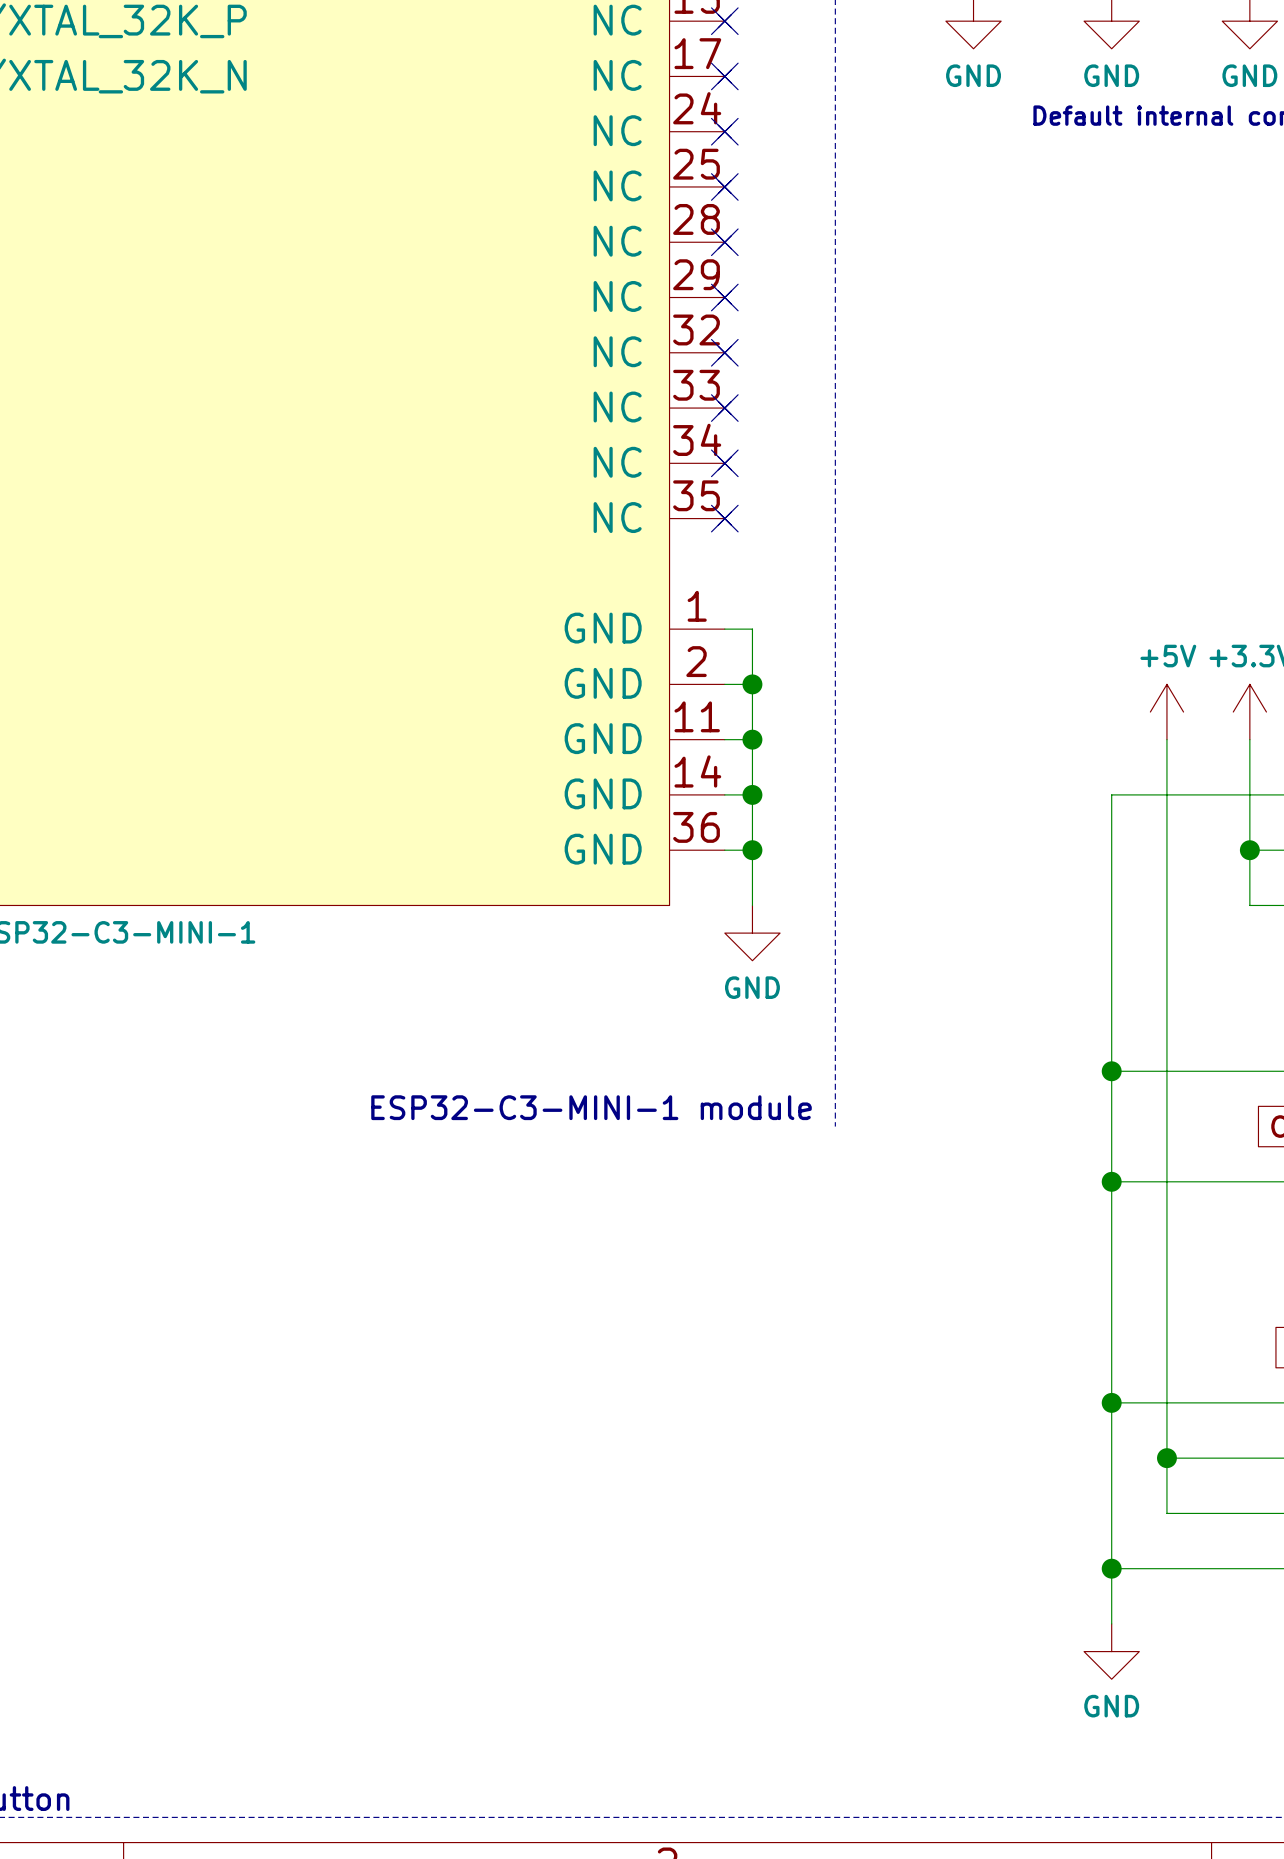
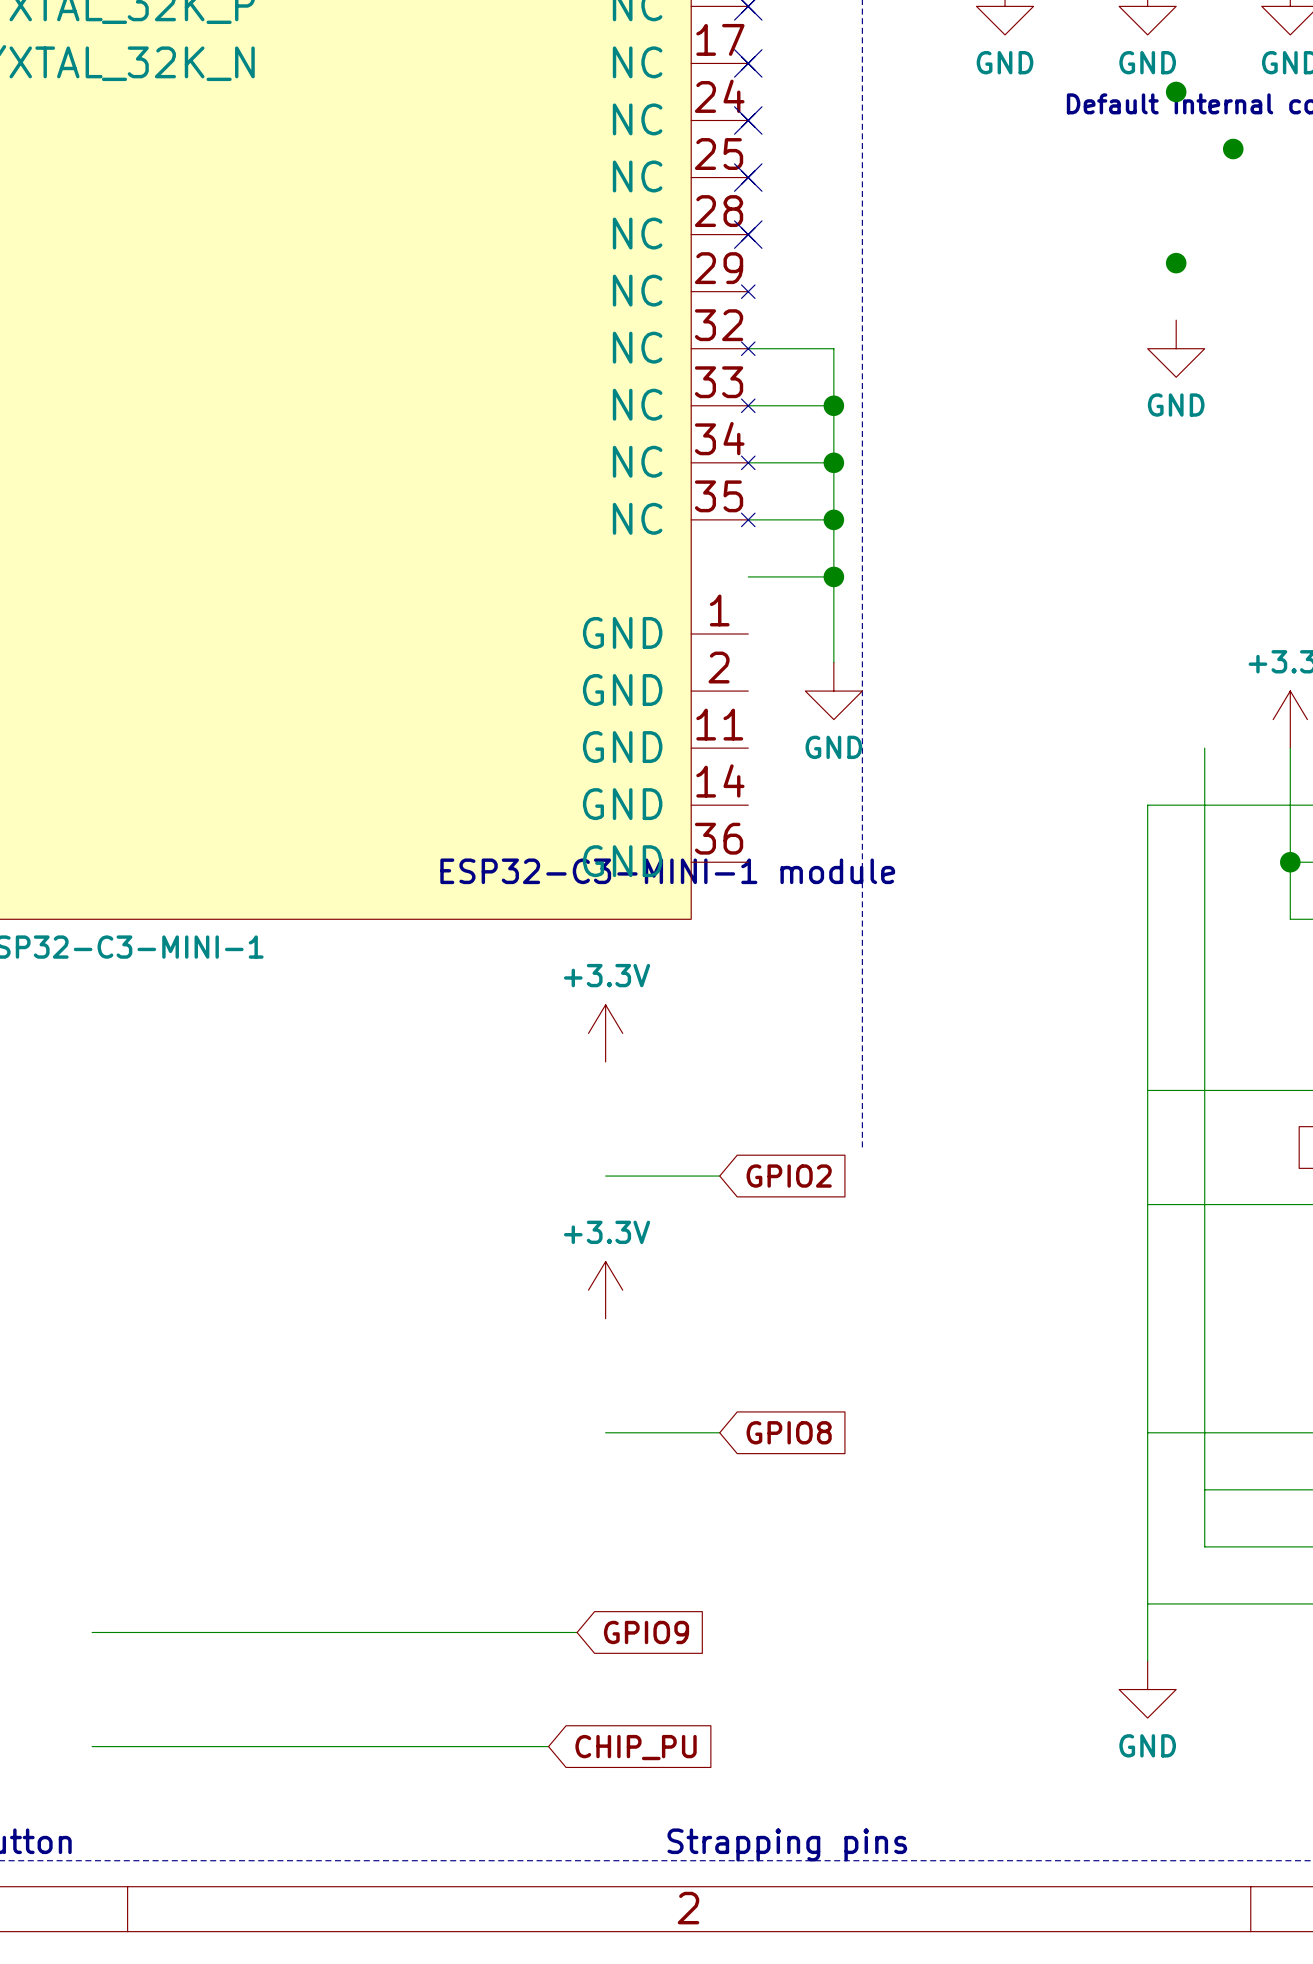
junction: none -> (1176, 91)
junction: none -> (1233, 149)
junction: none -> (1176, 263)
no-connect mark: (724, 297) -> none
wire: none -> (748, 348) (833, 348) (833, 662)
no-connect mark: (724, 352) -> none
power symbol: none -> GND (1176, 348)
wire: none -> (748, 405) (833, 405)
no-connect mark: (724, 408) -> none
junction: none -> (833, 405)
wire: none -> (748, 462) (833, 462)
no-connect mark: (724, 463) -> none
junction: none -> (833, 462)
wire: none -> (748, 519) (833, 519)
no-connect mark: (724, 518) -> none
junction: none -> (833, 519)
wire: none -> (748, 576) (833, 576)
junction: none -> (833, 576)
wire: (724, 629) (752, 629) (752, 905) -> none
wire: (724, 684) (752, 684) -> none
junction: (752, 684) -> none
power symbol: +5V (1166, 712) -> none
wire: (724, 739) (752, 739) -> none
junction: (752, 739) -> none
wire: (724, 794) (752, 794) -> none
junction: (752, 794) -> none
wire: (724, 850) (752, 850) -> none
junction: (752, 850) -> none
power symbol position: GND (752, 933) -> GND (833, 691)
power symbol: none -> +3.3V (605, 1033)
junction: (1111, 1071) -> none
text position: ESP32-C3-MINI-1 module (591, 1107) -> ESP32-C3-MINI-1 module (667, 871)
wire: none -> (605, 1176) (719, 1176)
global label: none -> GPIO2 (789, 1176)
junction: (1111, 1181) -> none
power symbol: none -> +3.3V (605, 1290)
wire: none -> (605, 1432) (719, 1432)
global label: none -> GPIO8 (789, 1432)
junction: (1111, 1402) -> none
junction: (1166, 1458) -> none
junction: (1111, 1568) -> none
wire: none -> (92, 1632) (577, 1632)
global label: none -> GPIO9 (646, 1632)
wire: none -> (92, 1746) (548, 1746)
global label: none -> CHIP_PU (636, 1747)
text: none -> Strapping pins (787, 1844)

